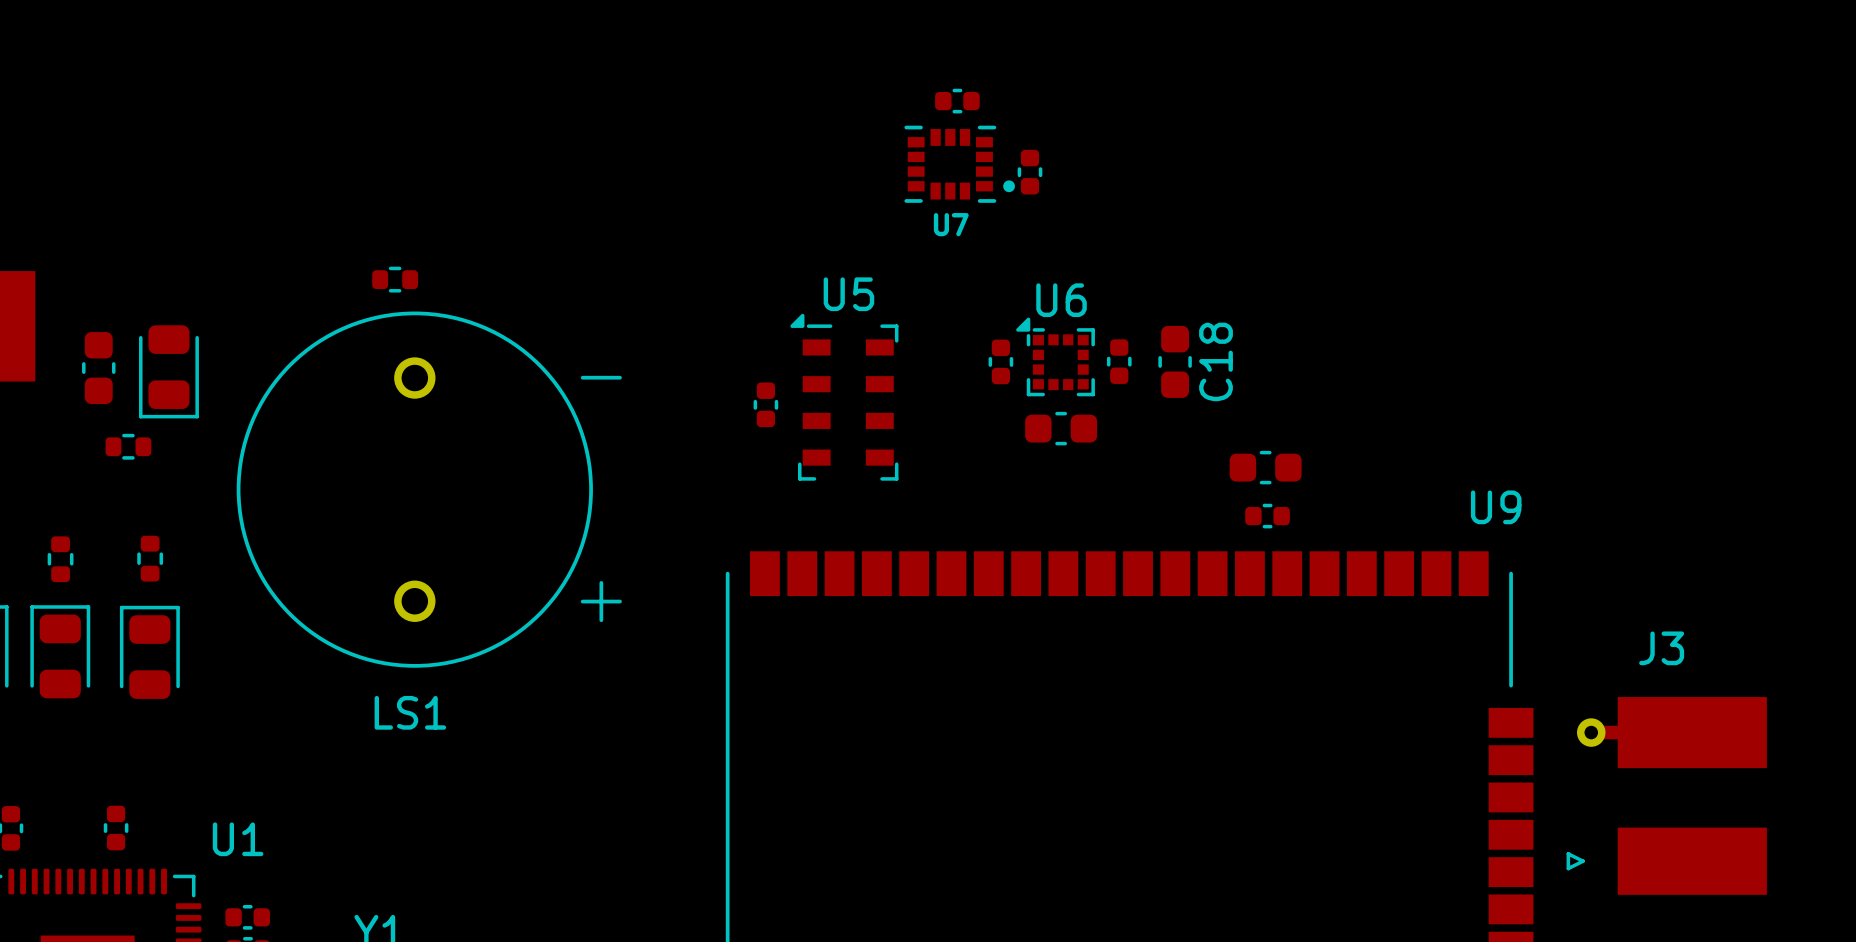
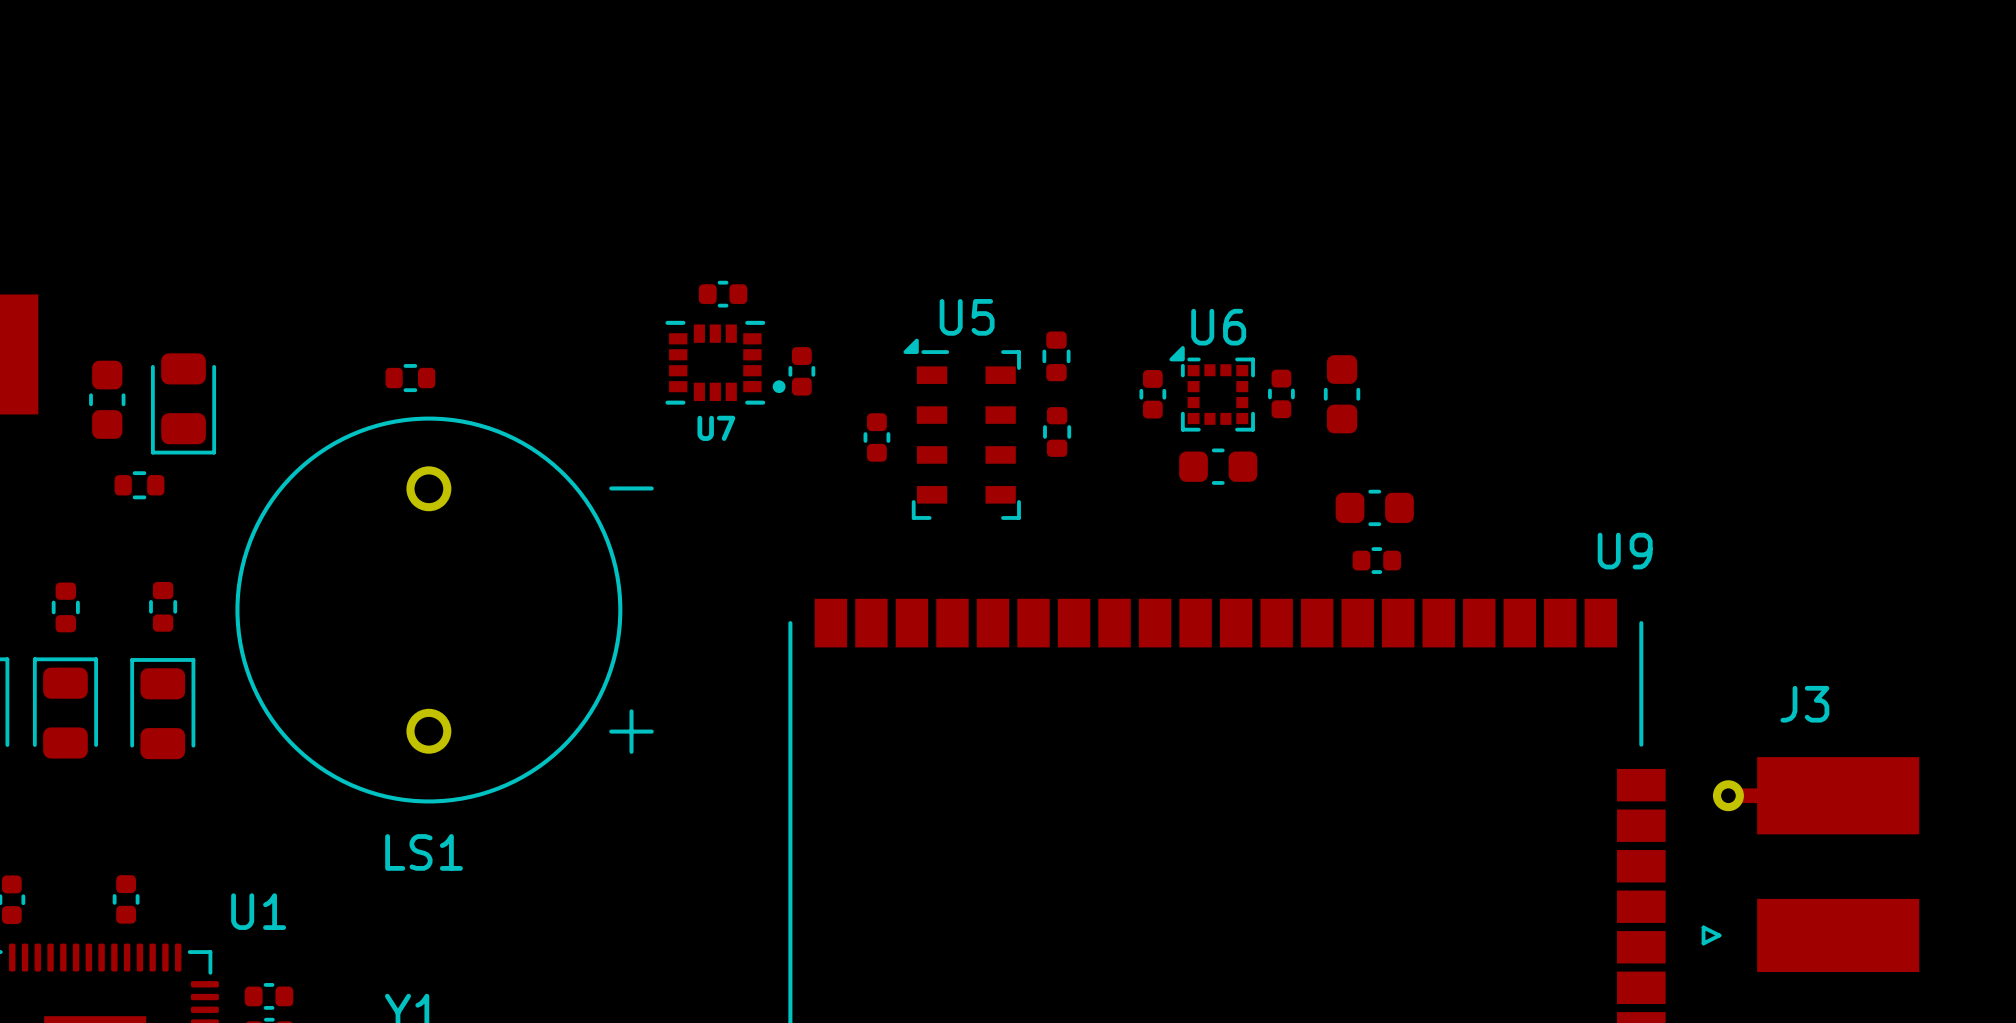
part: (957, 101) -> none
U7 position: (959, 164) -> (725, 362)
part: (1029, 172) -> none
part: none -> (723, 294)
part position: (395, 279) -> (410, 378)
part: none -> (1056, 356)
part: none -> (801, 371)
U6 position: (1055, 356) -> (1212, 388)
part: (1000, 361) -> none
part: (1119, 361) -> none
C18: (1175, 361) -> none
part: none -> (1152, 394)
part: none -> (1281, 393)
part: none -> (1342, 394)
U5 position: (844, 397) -> (962, 429)
part: none -> (1057, 431)
part: none -> (876, 437)
part: (765, 404) -> none
part position: (1061, 428) -> (1218, 466)
LS1 position: (429, 489) -> (444, 610)

